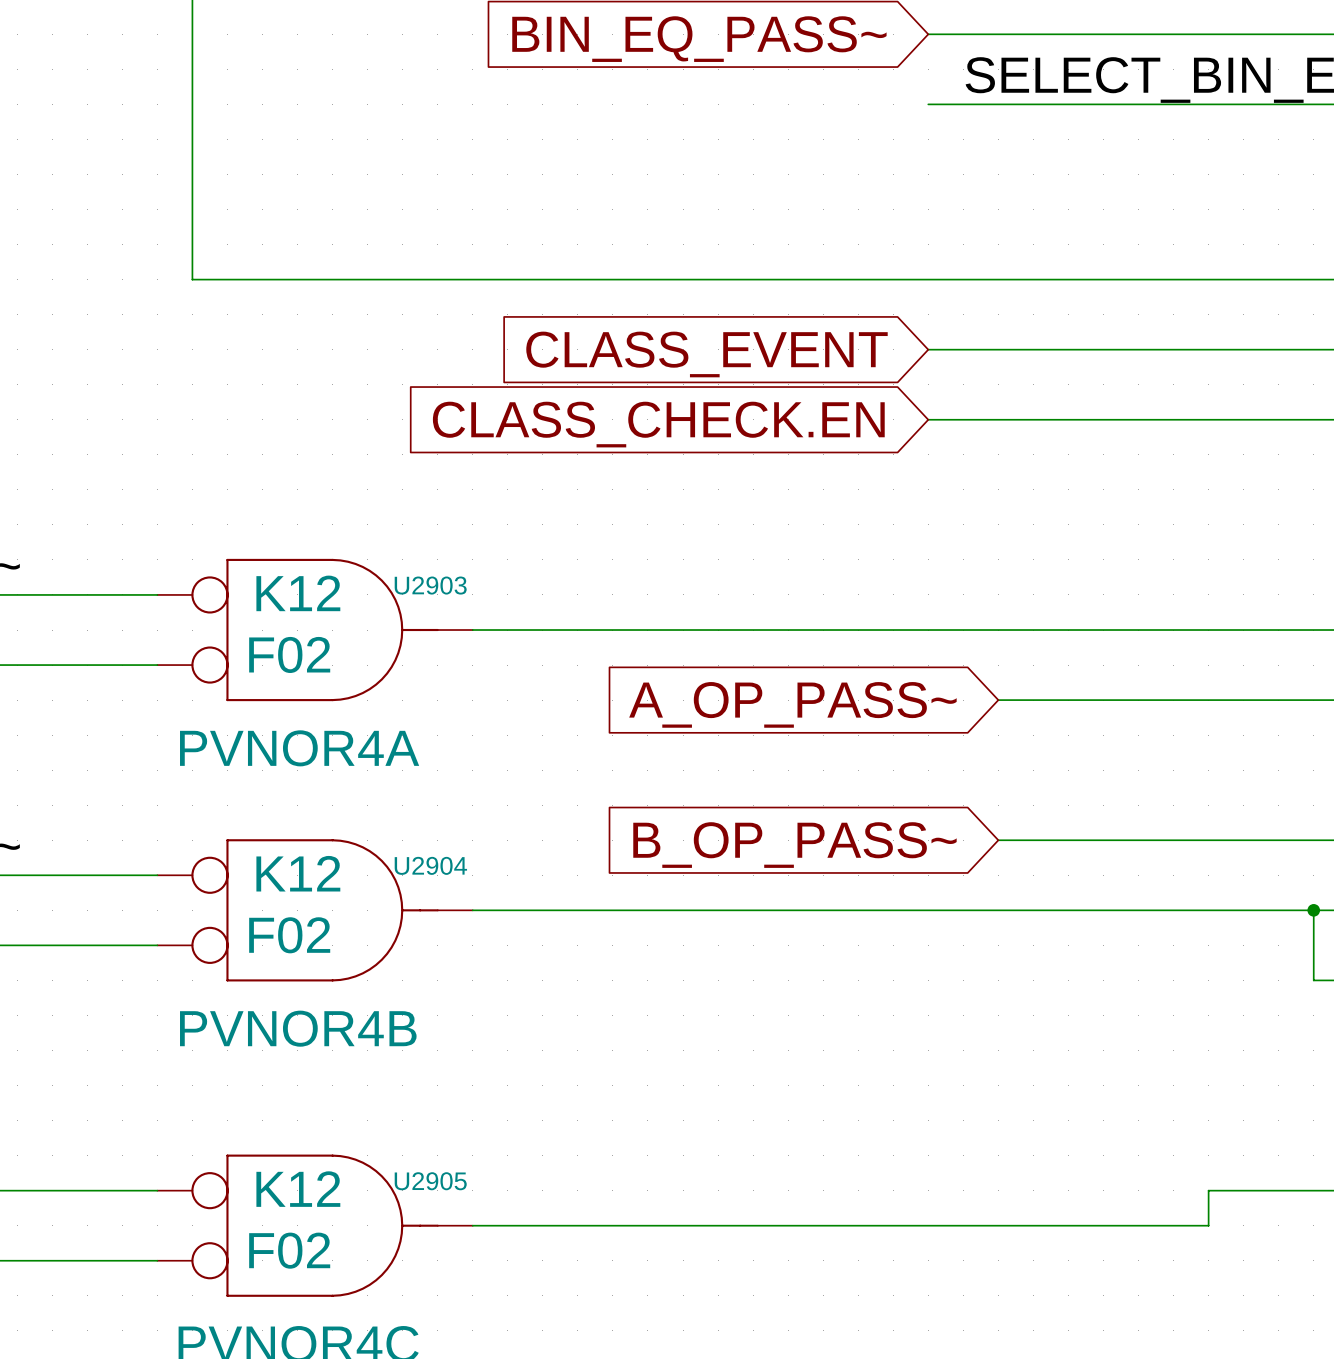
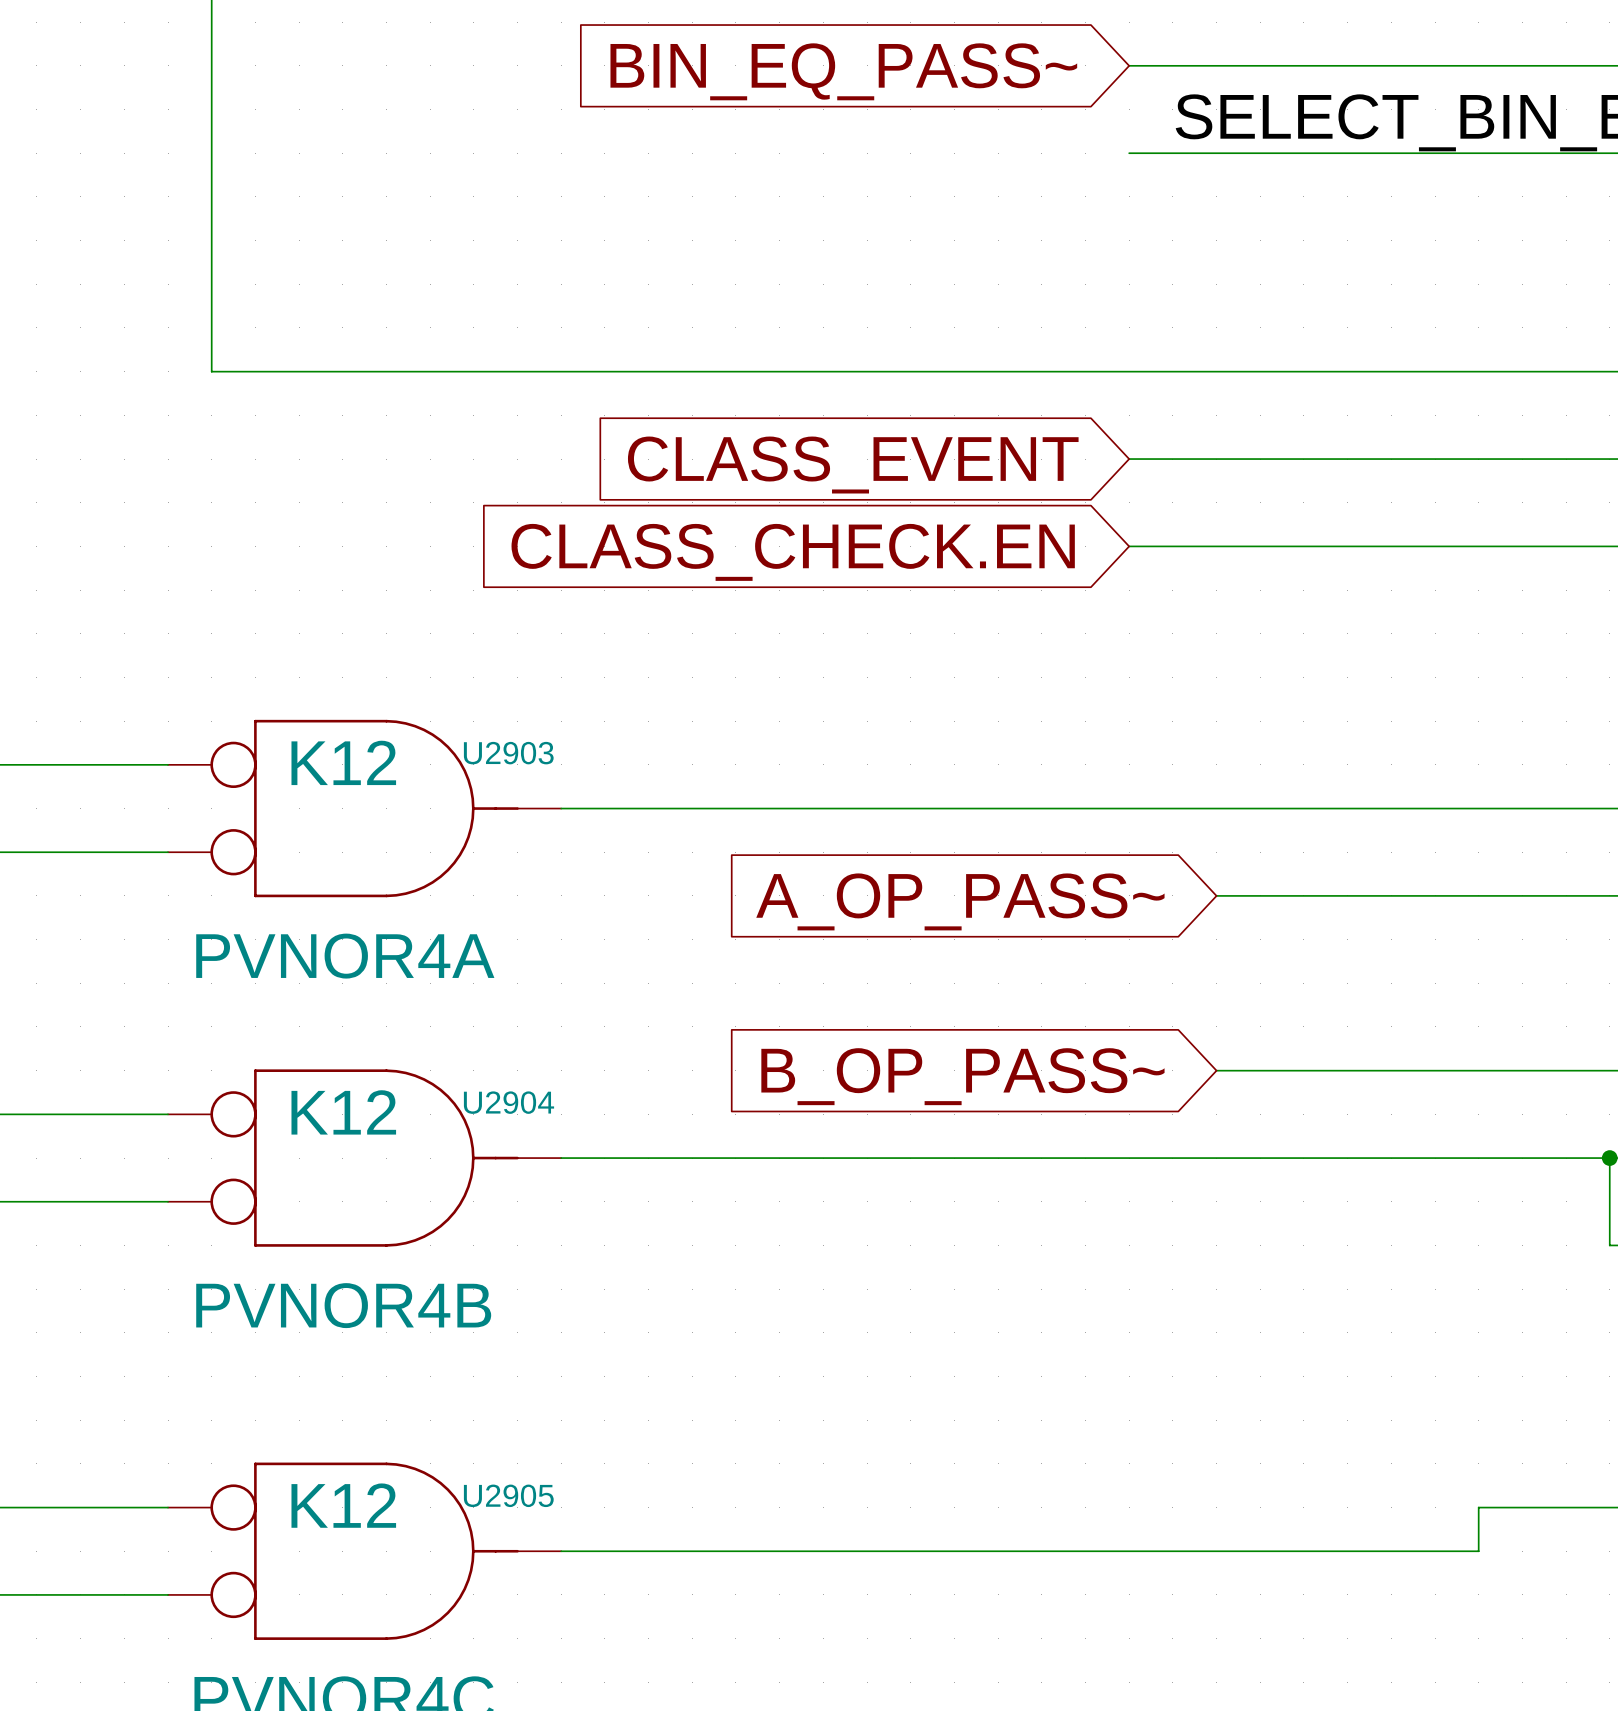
U2903 value: F02 (289, 654) -> none
U2904 value: F02 (289, 935) -> none
U2905 value: F02 (289, 1250) -> none

